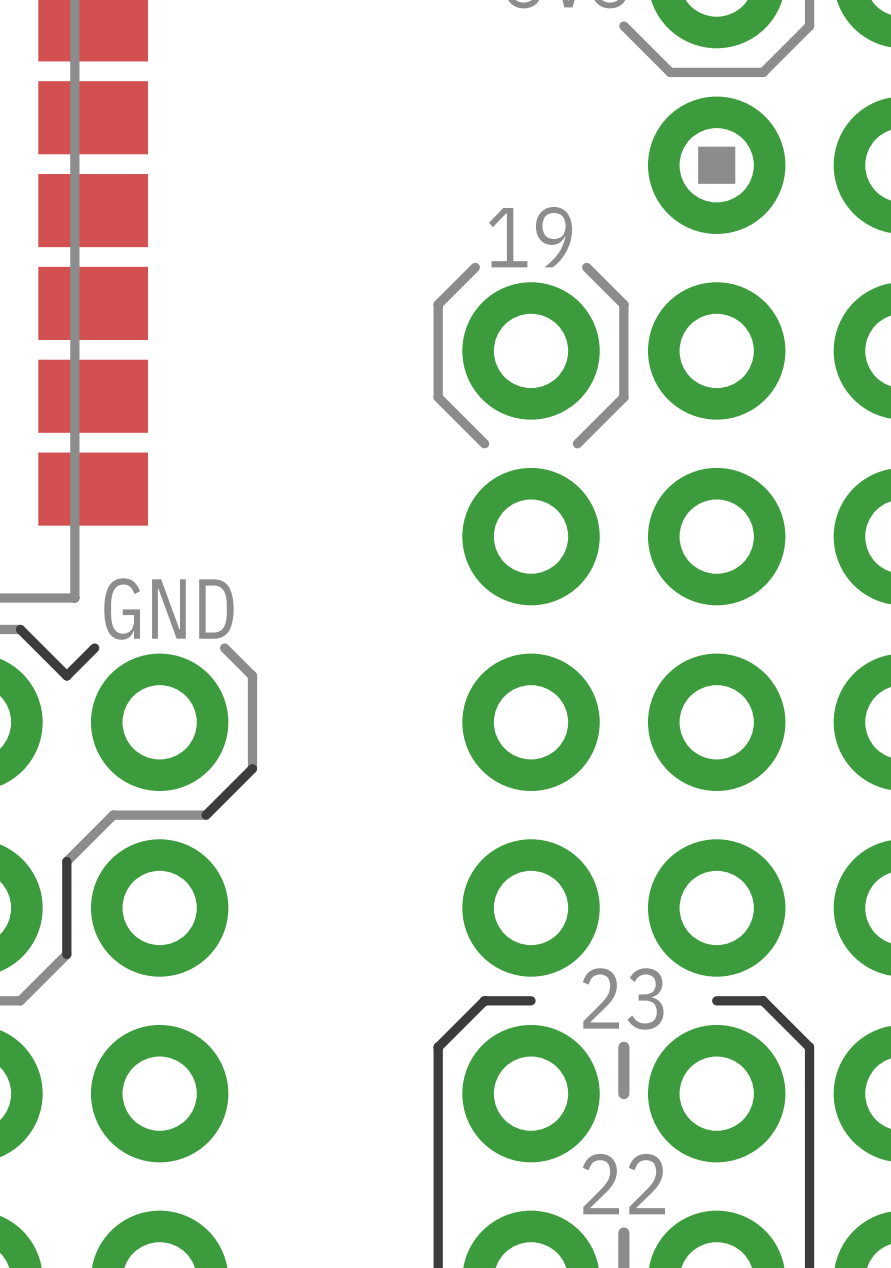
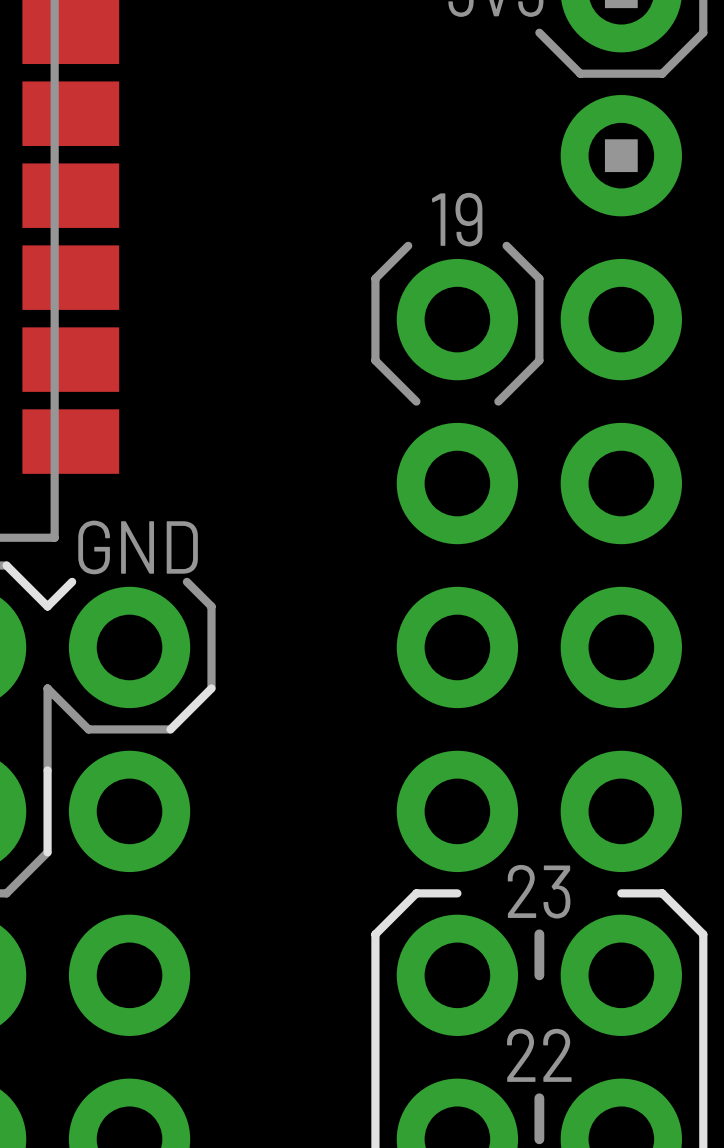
line: (113, 815) (66, 861) -> (88, 729) (47, 688) (47, 770)

